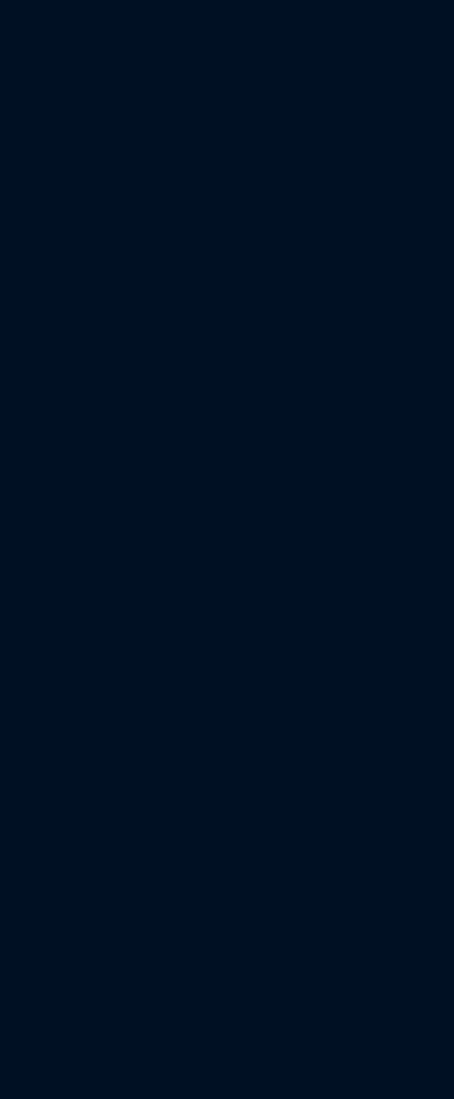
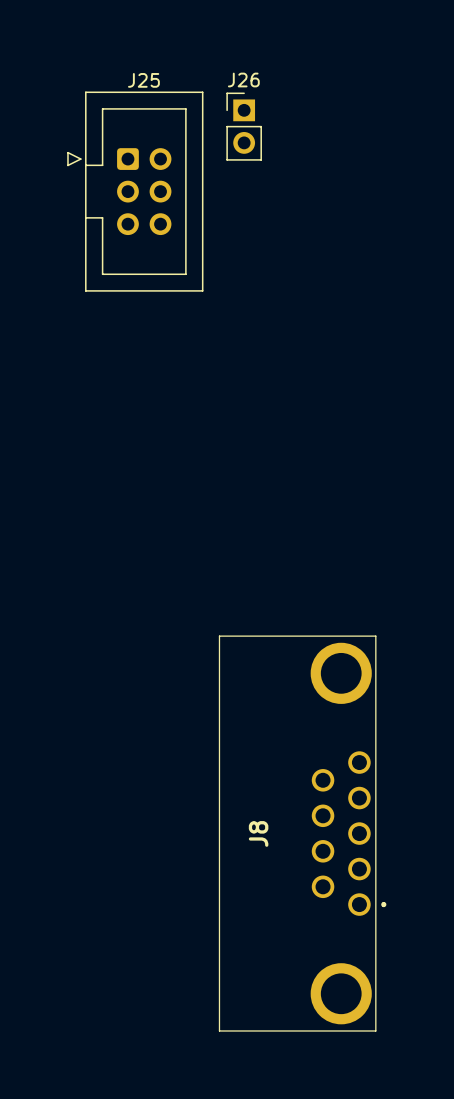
J26: none -> (244, 126)
J25: none -> (135, 191)
J8: none -> (302, 833)

